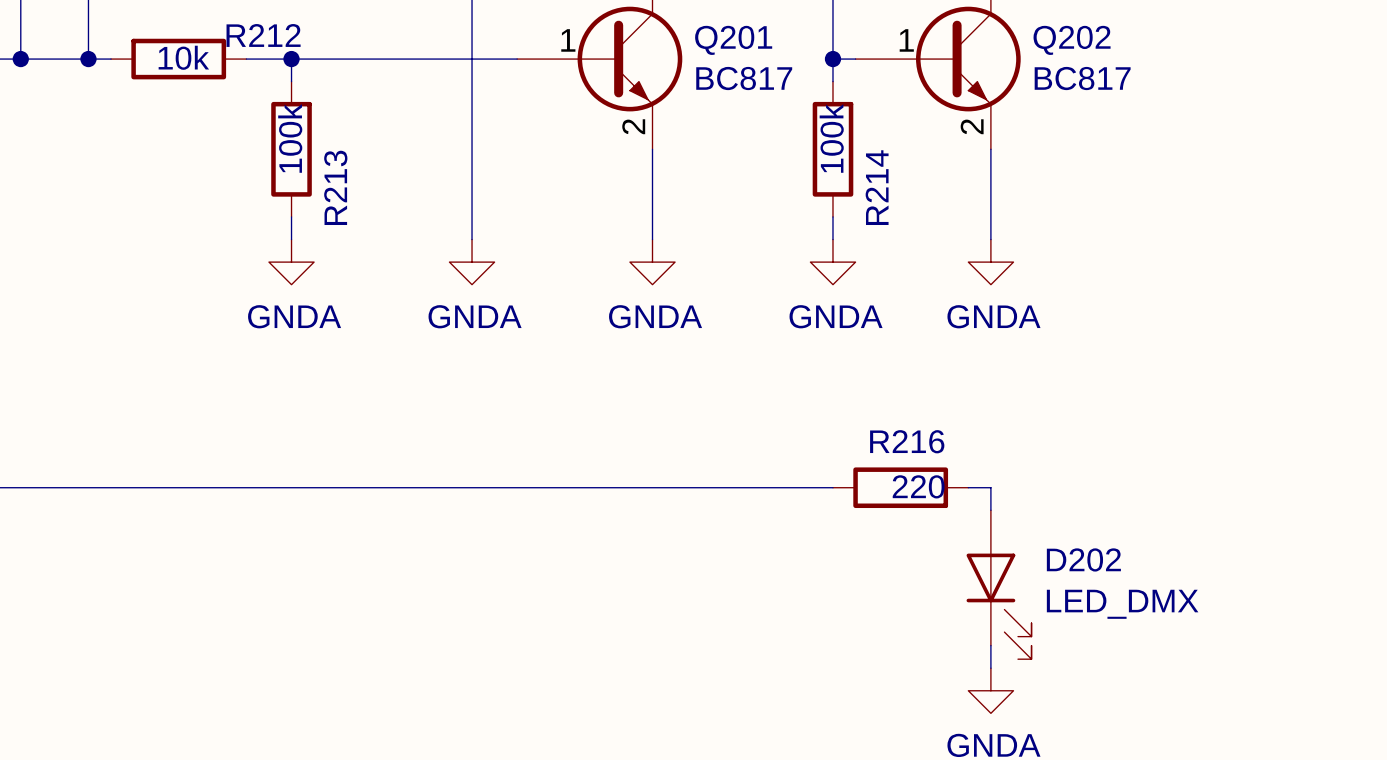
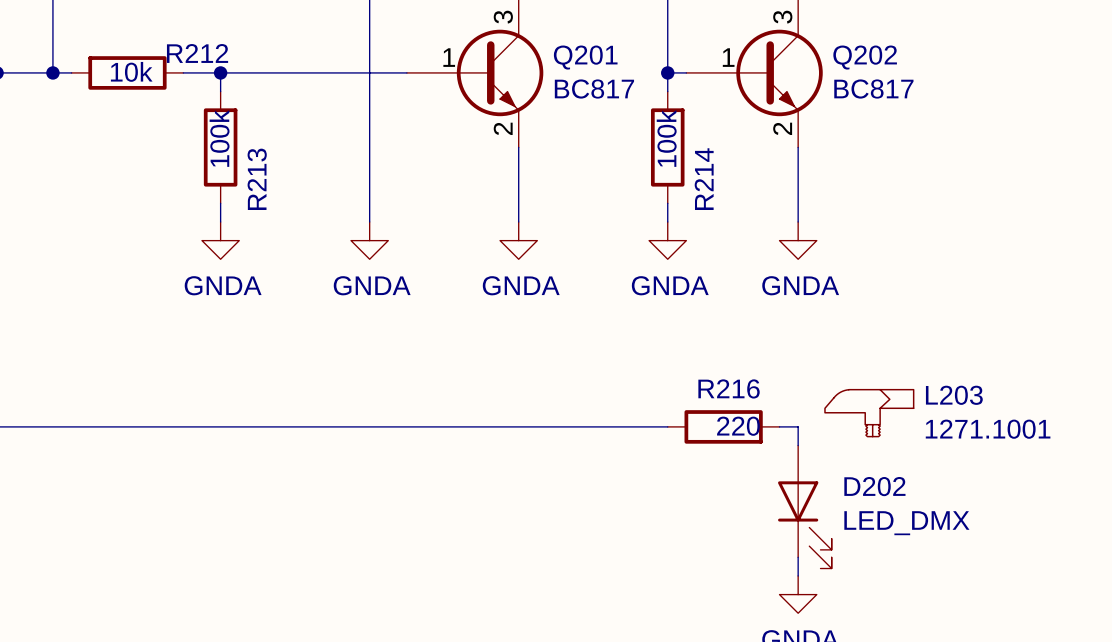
L203: none -> 1271.1001 (869, 413)

